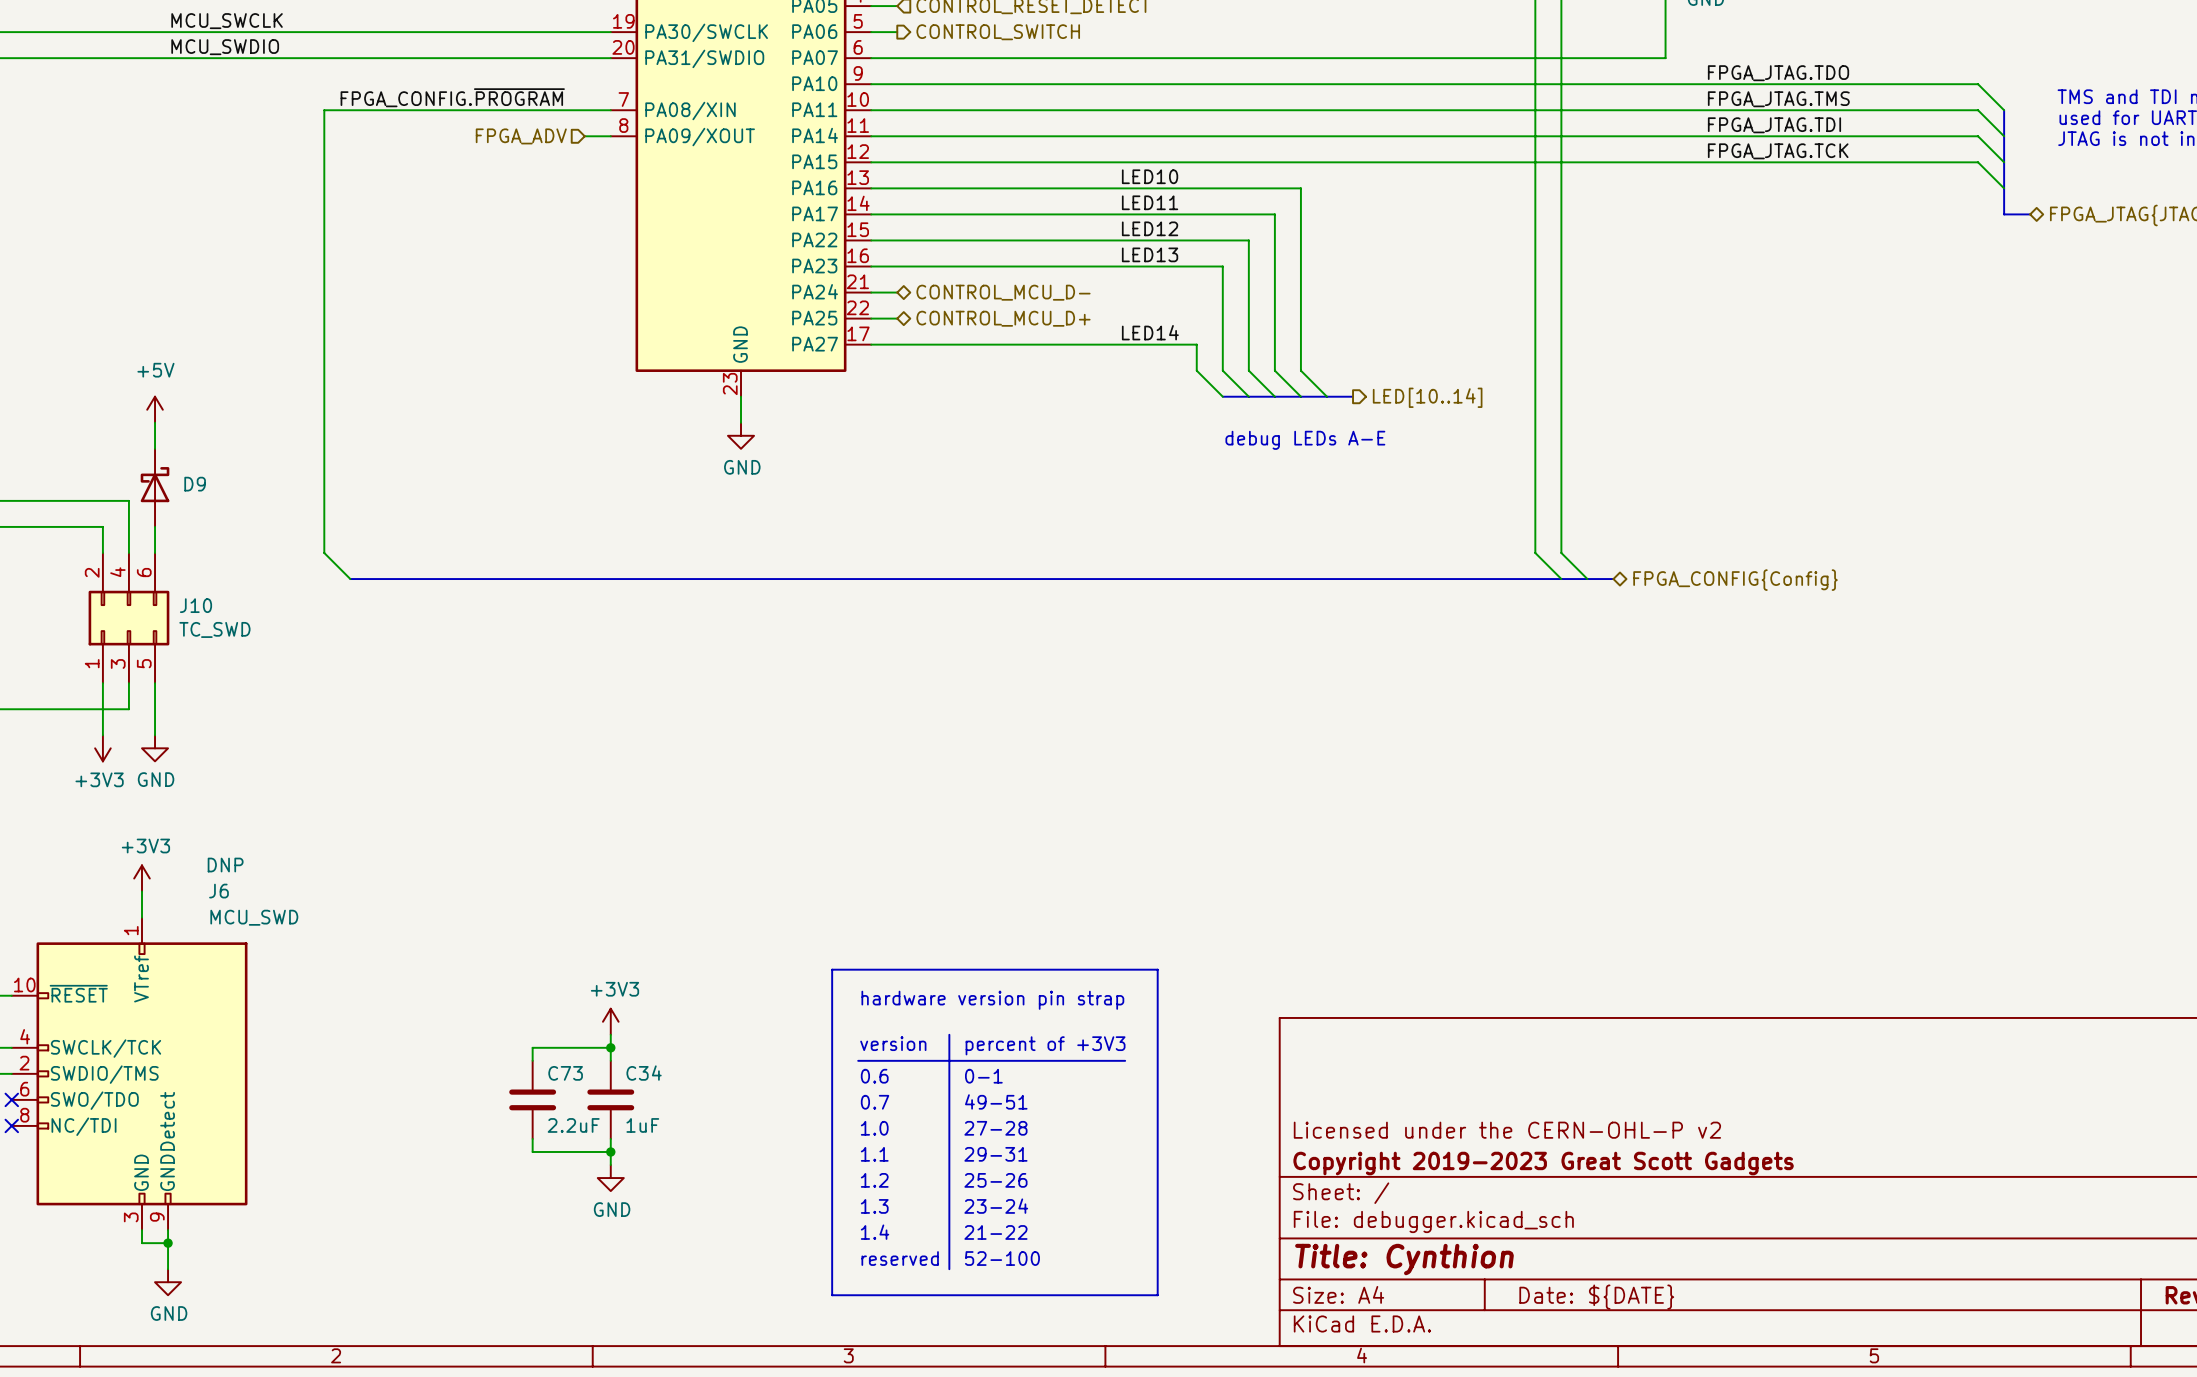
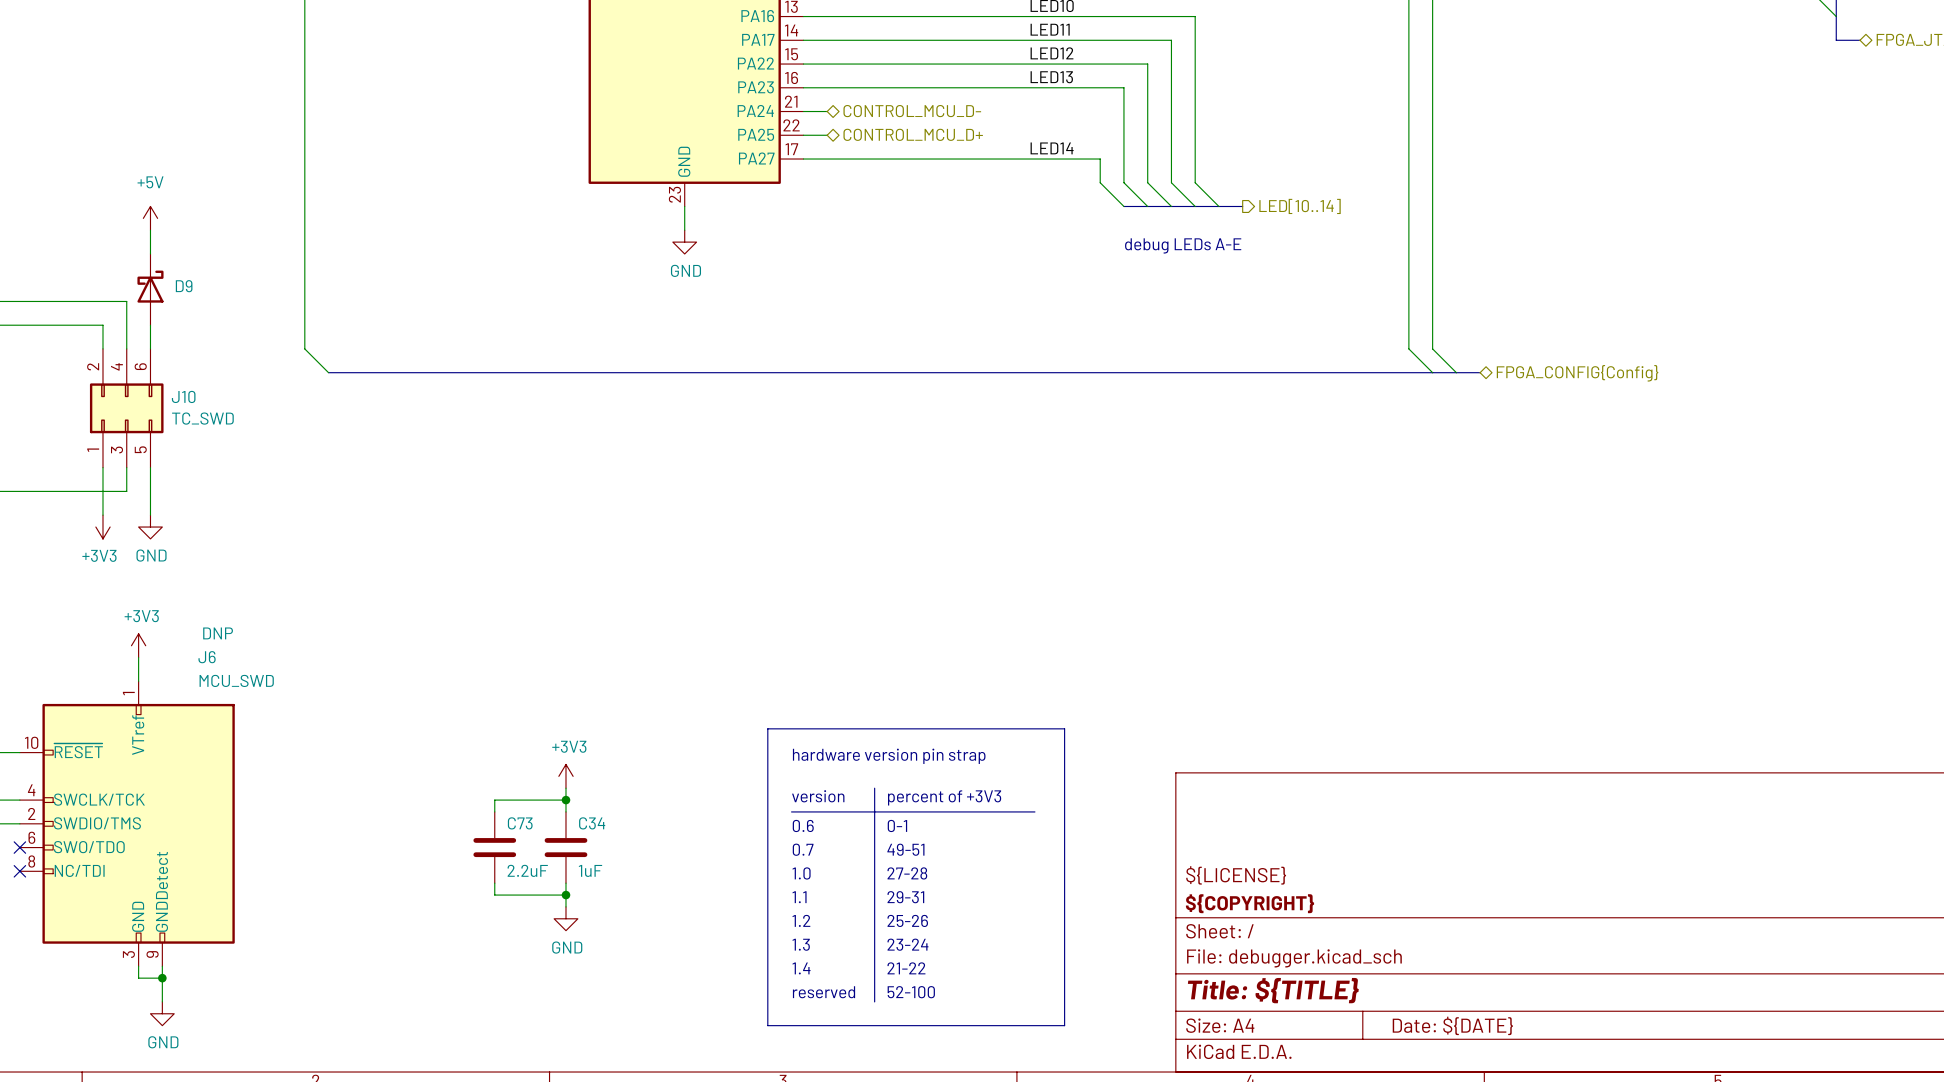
title block: Licensed under the CERN-OHL-P v2 (1507, 1130) -> ${LICENSE} (1236, 875)
title block: Copyright 2019-2023 Great Scott Gadgets (1543, 1163) -> ${COPYRIGHT} (1249, 903)
title block: Title: Cynthion (1404, 1259) -> Title: ${TITLE} (1273, 990)

